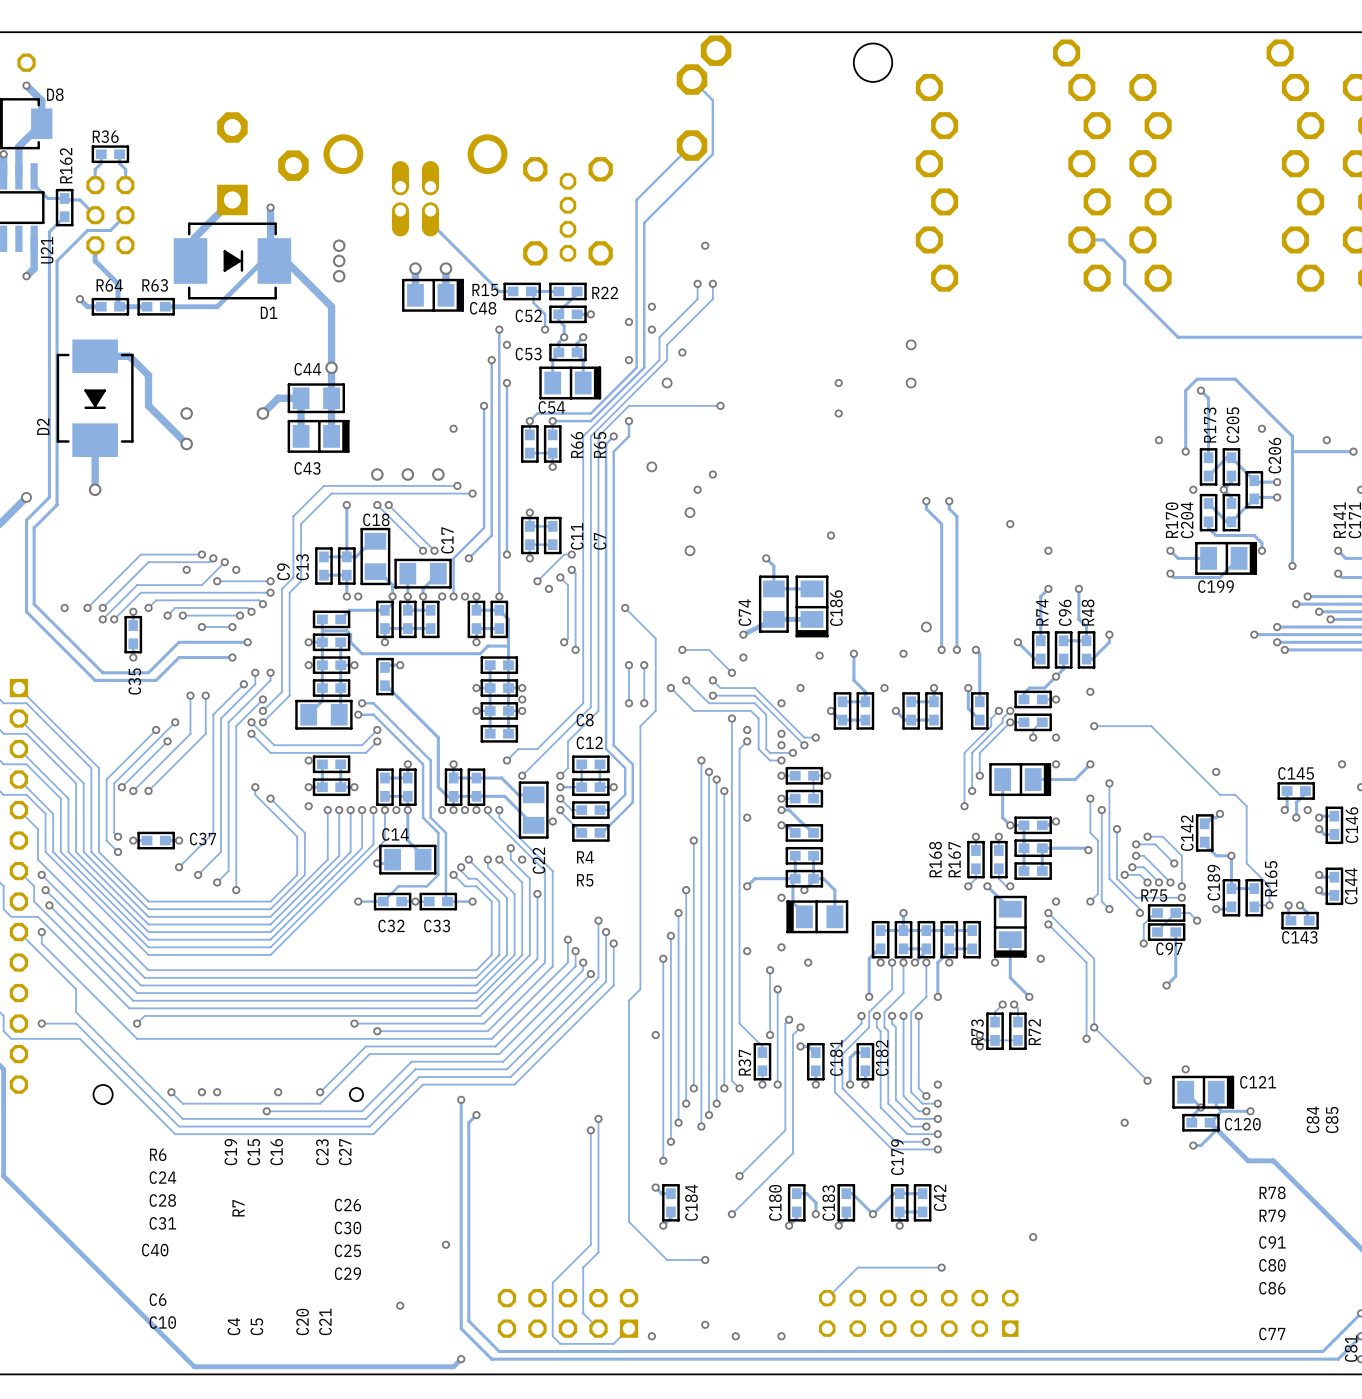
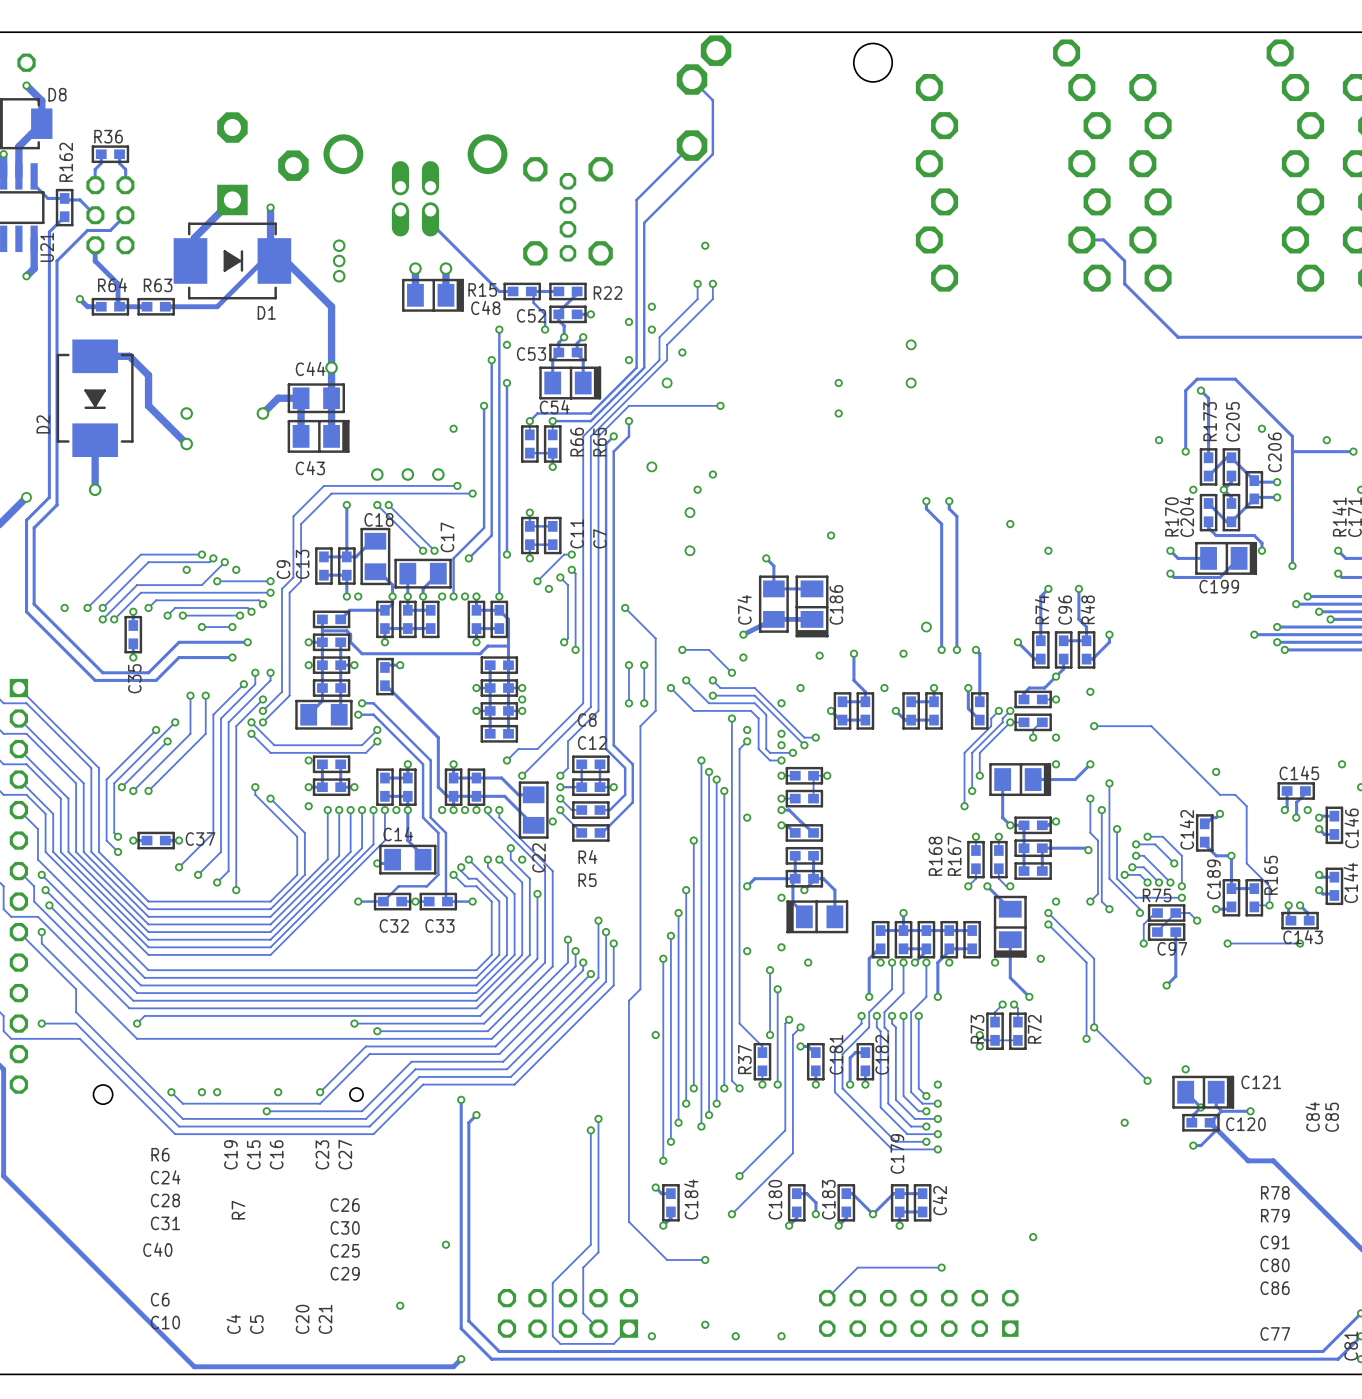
via: none -> (1227, 943)
track: none -> (1300, 943) (1227, 943)
via: none -> (1300, 943)

